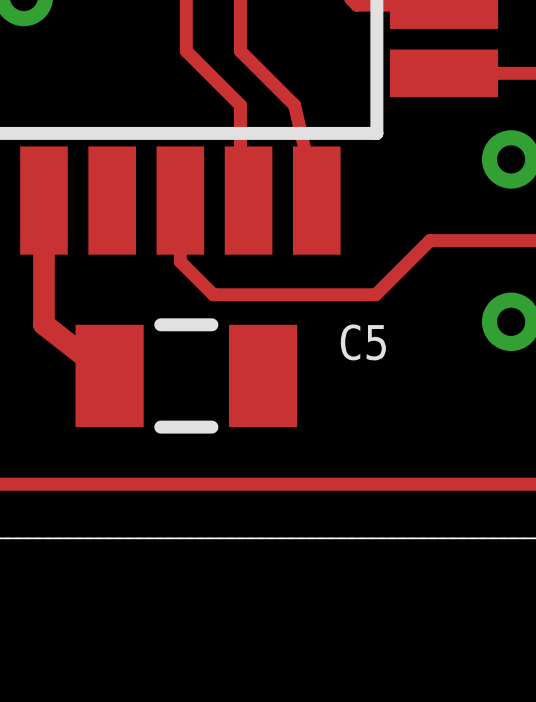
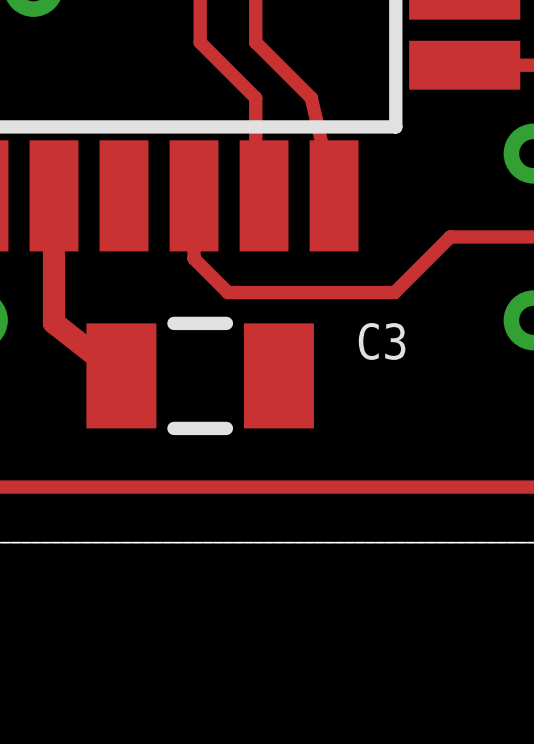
C5 name: C5 (363, 342) -> C3 (382, 341)

